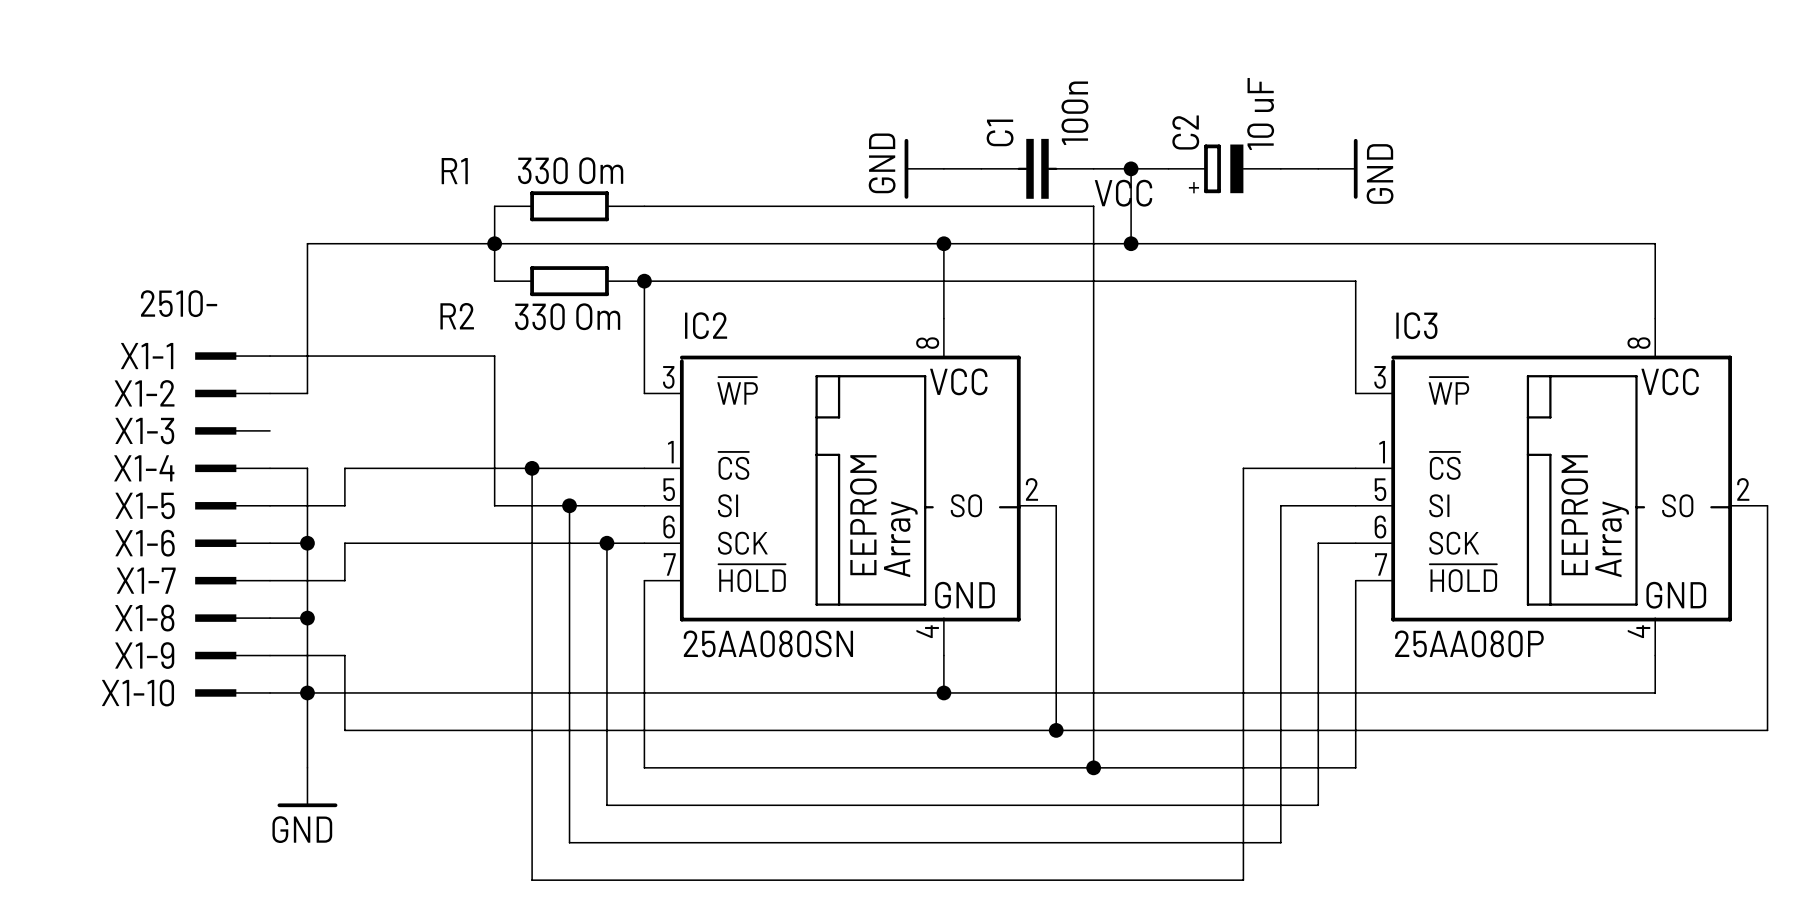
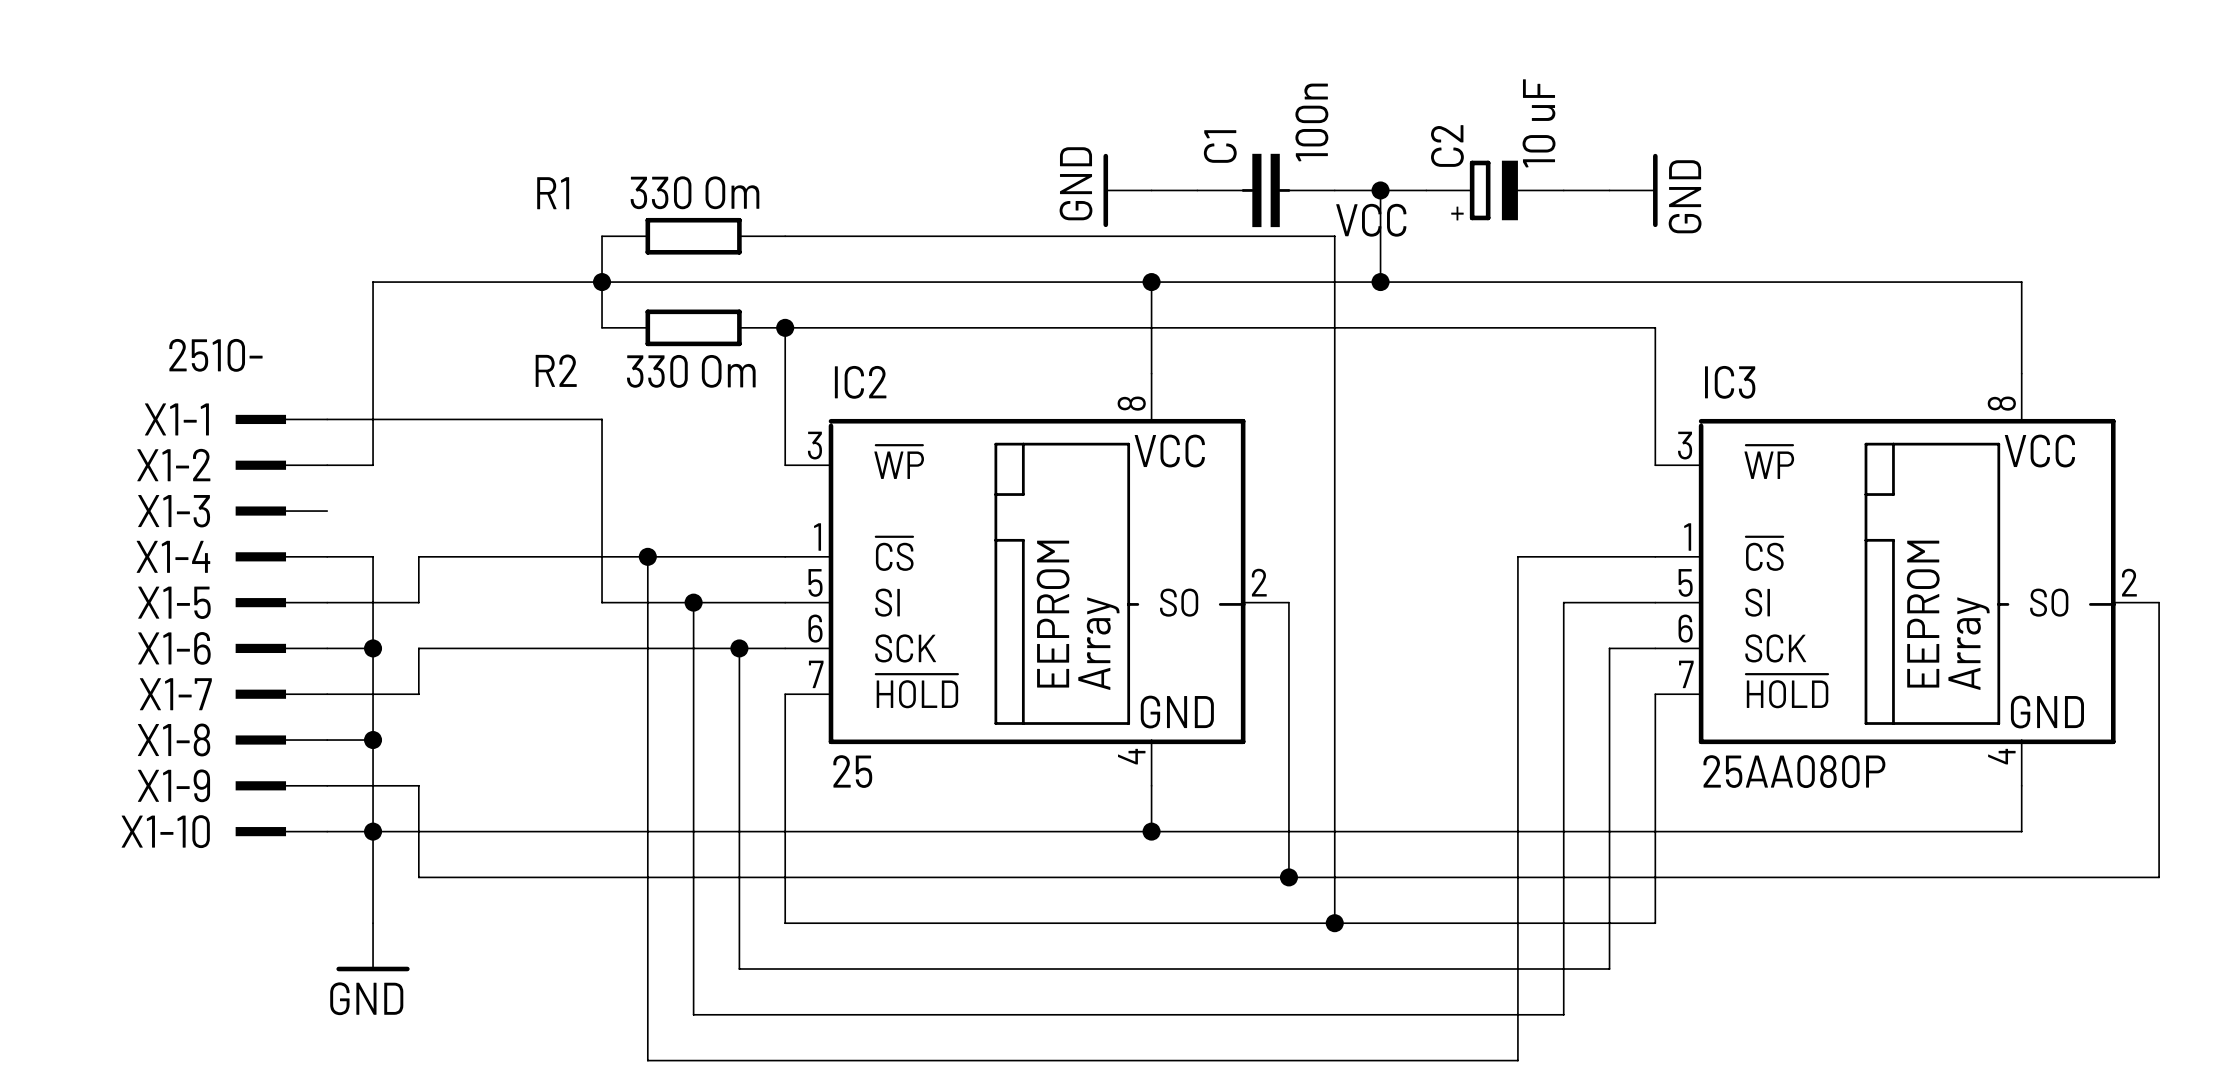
IC2 value: 25AA080SN (768, 643) -> 25 (852, 771)

